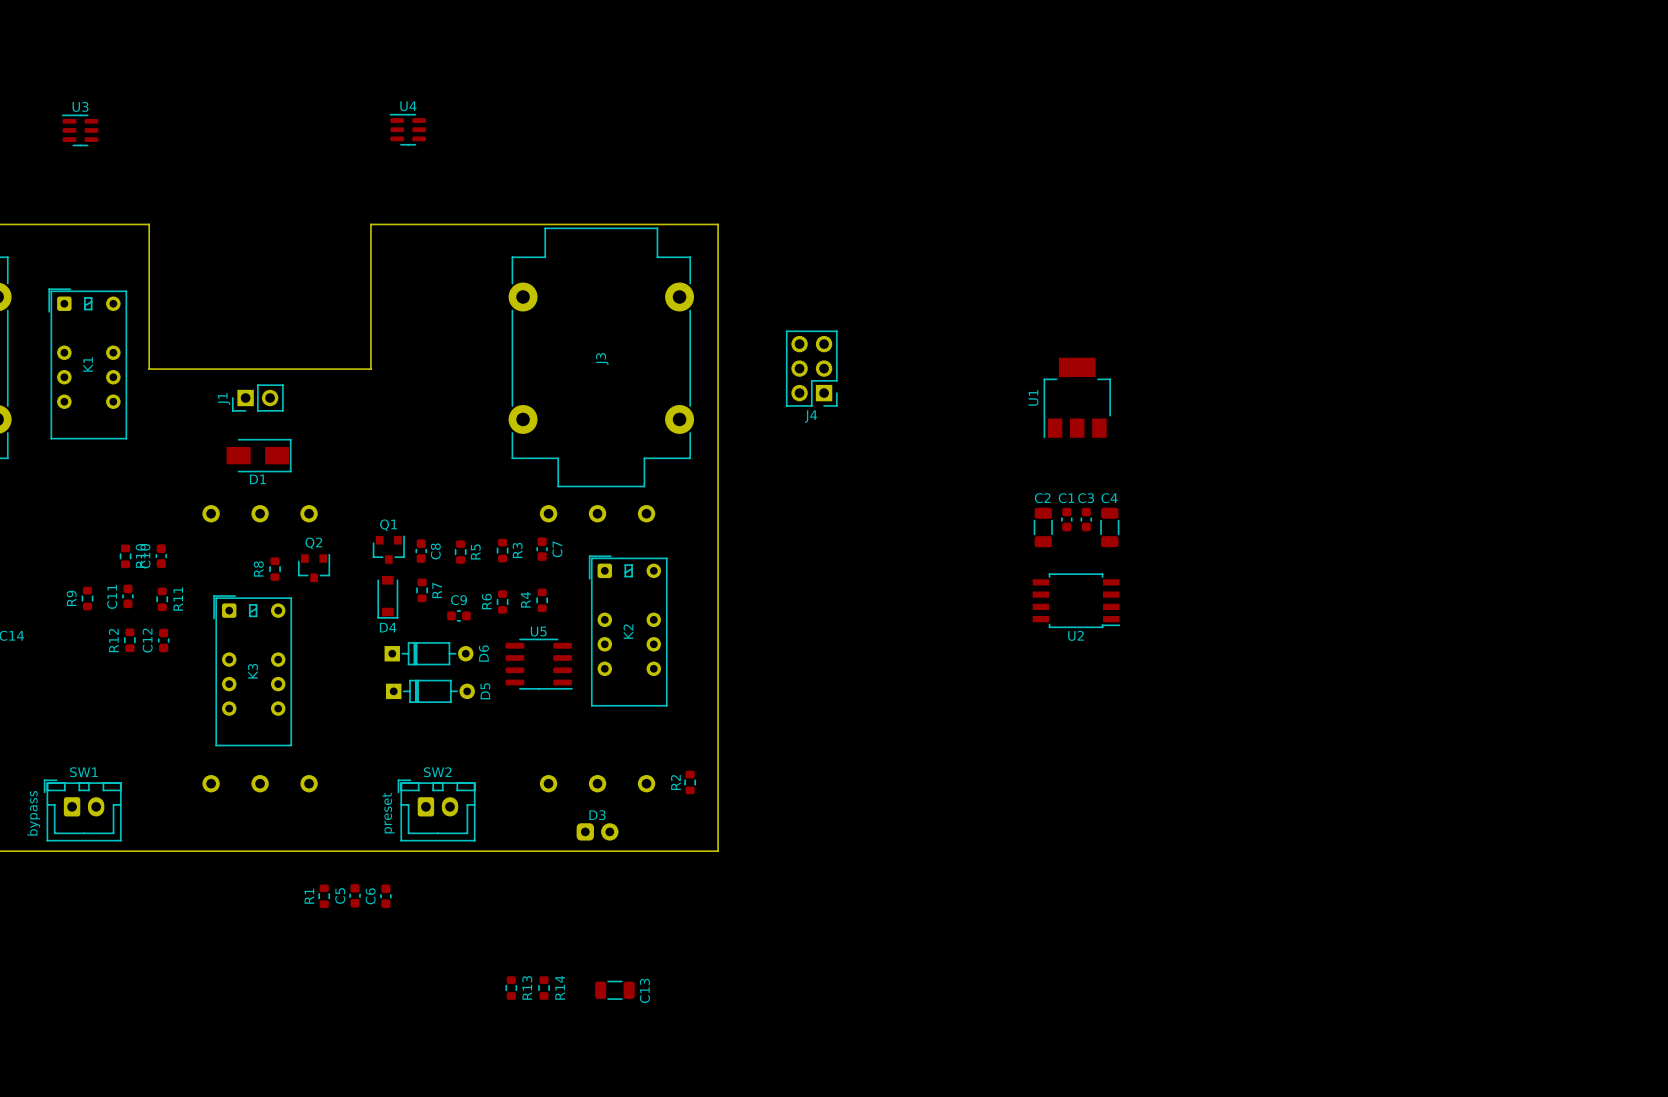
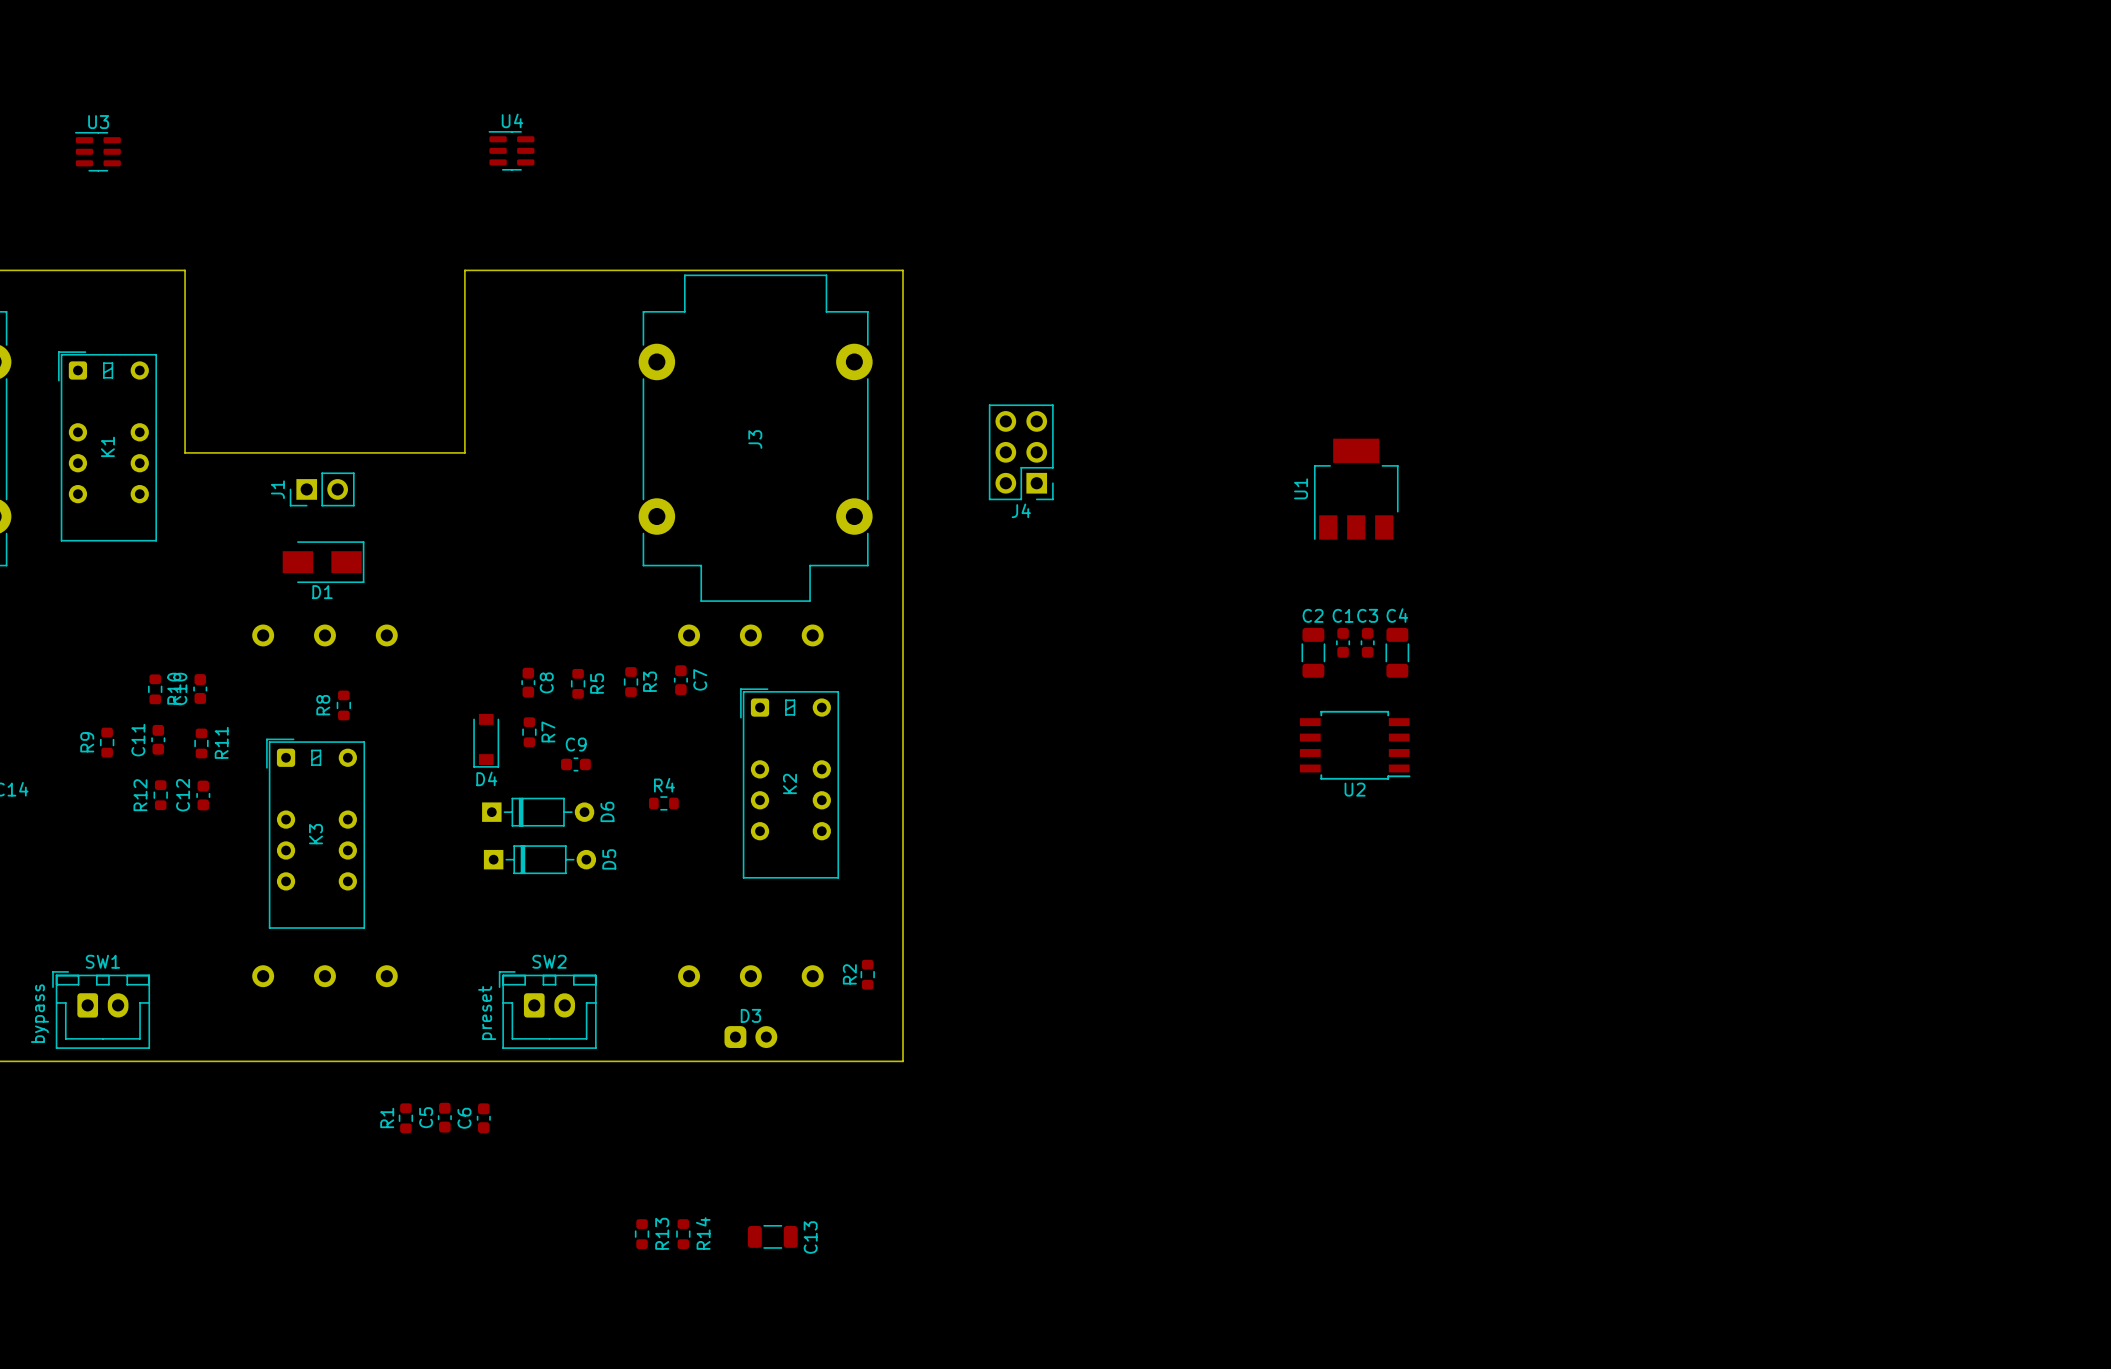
Q1: (388, 549) -> none
Q2: (314, 568) -> none
R4 rotation: 0° (542, 600) -> 90° clockwise (663, 803)
R4 position: (542, 600) -> (663, 803)
R6: (502, 601) -> none
U5: (539, 664) -> none

